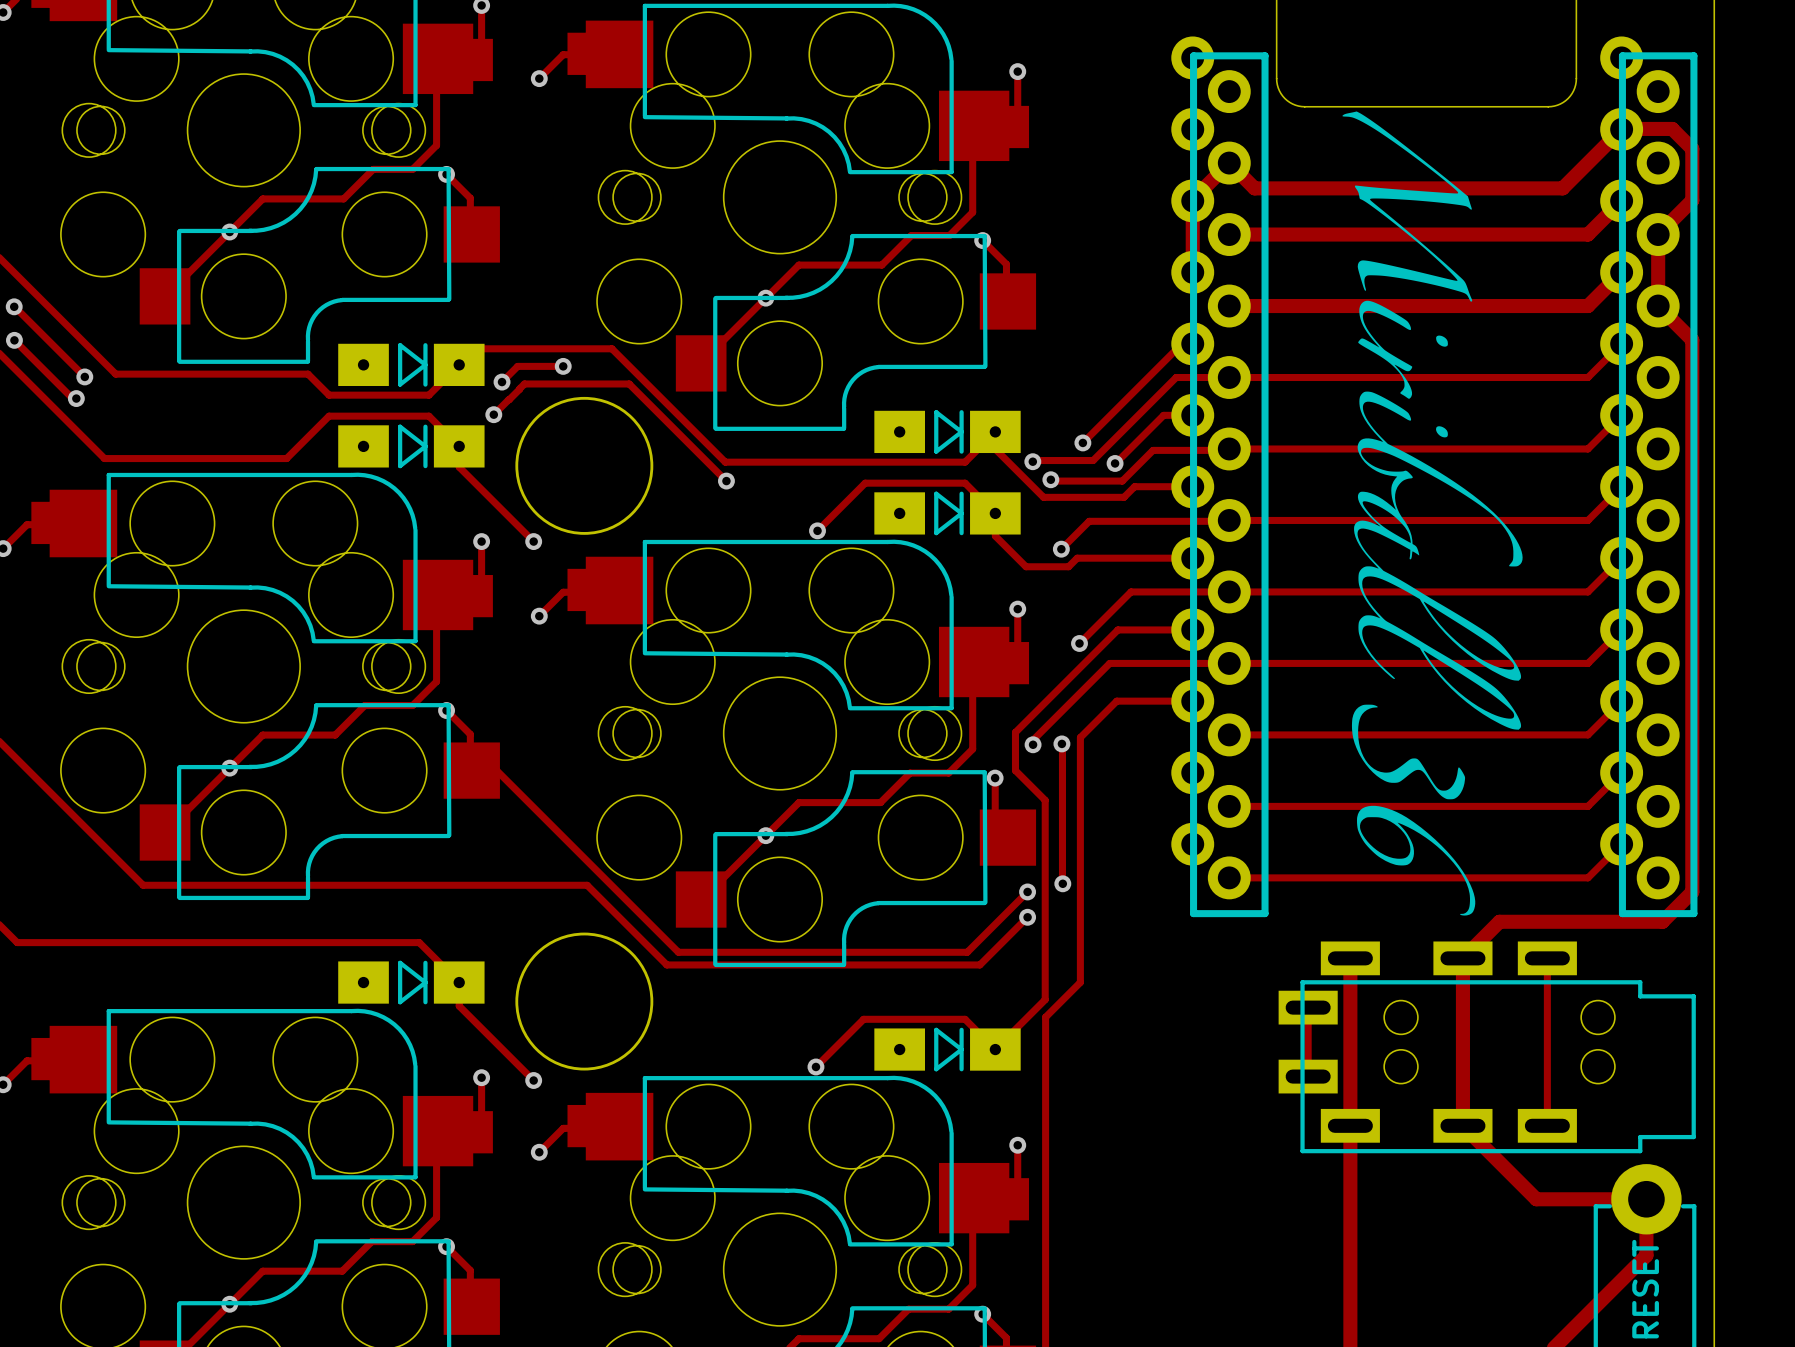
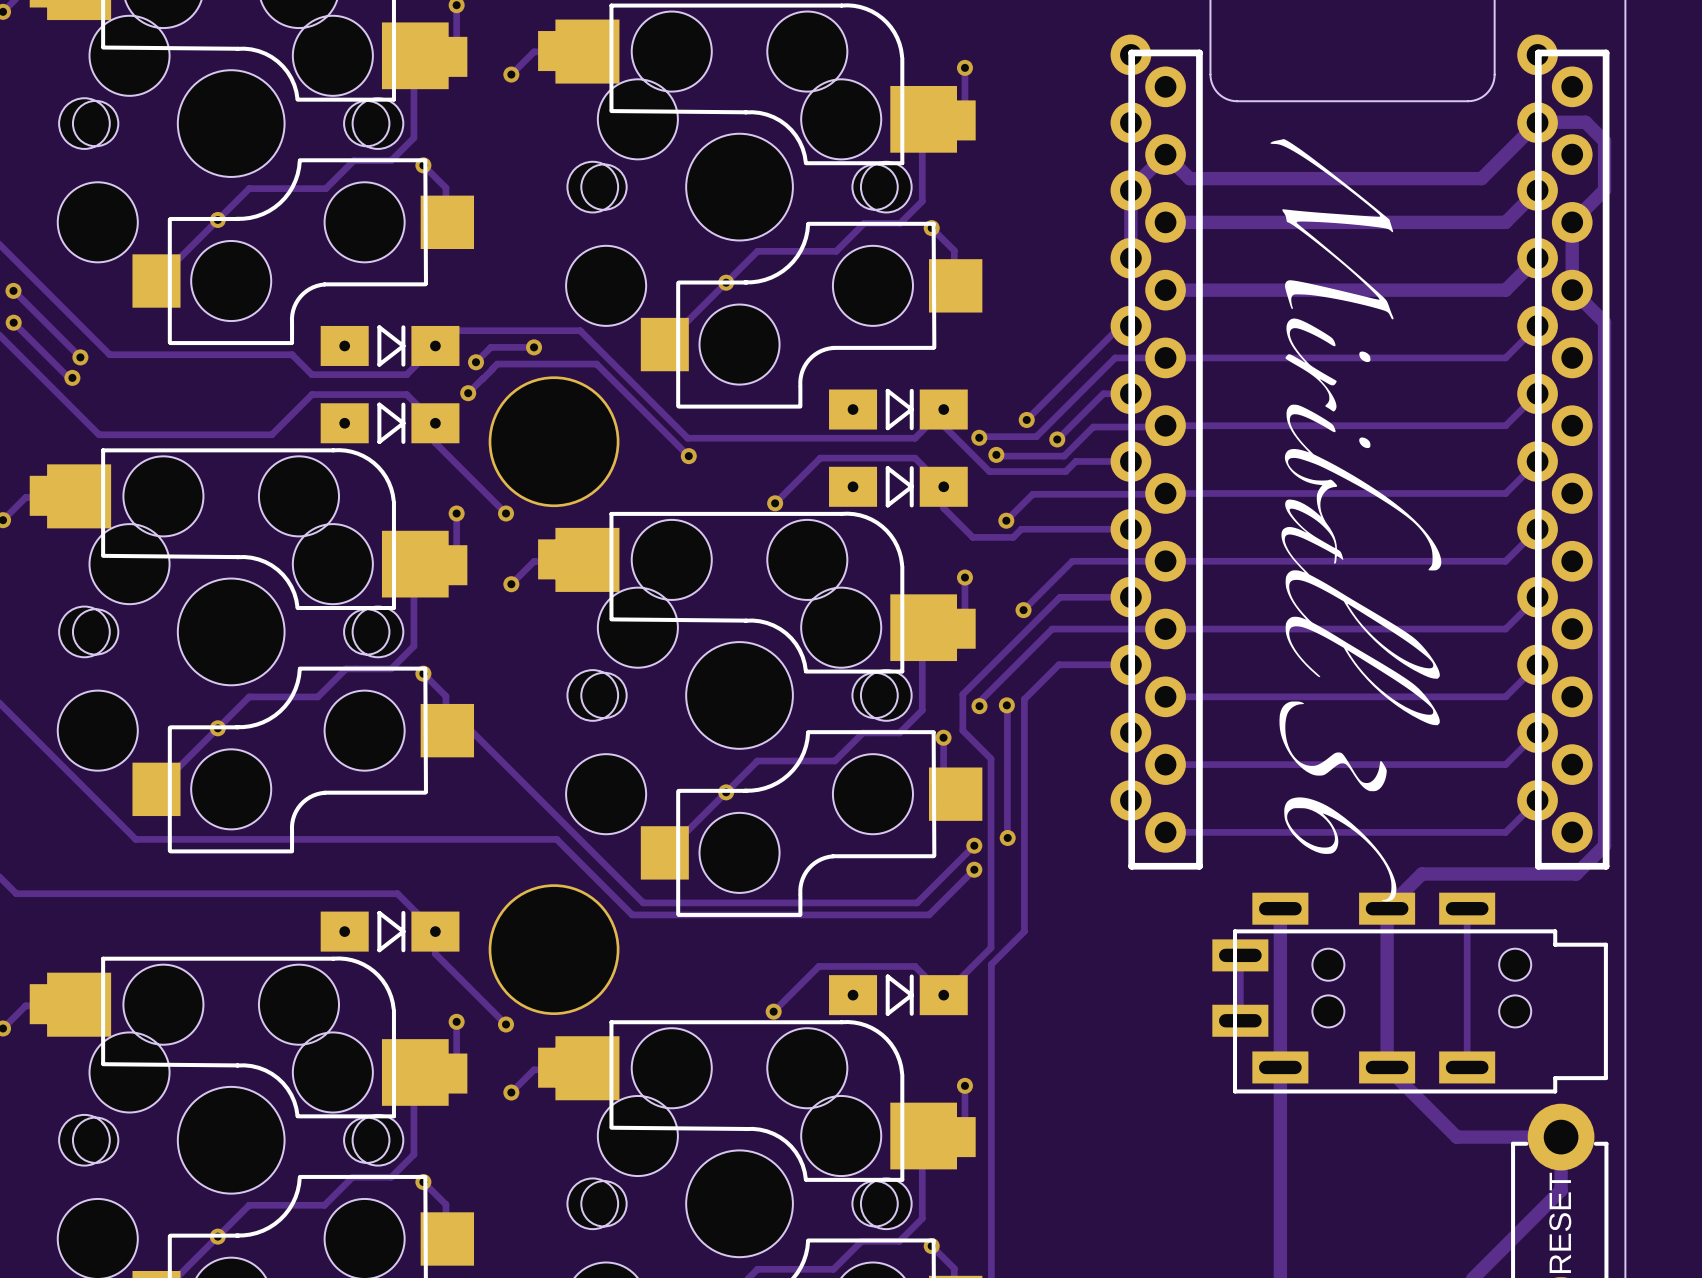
drawing position: (1432, 513) -> (1355, 520)

